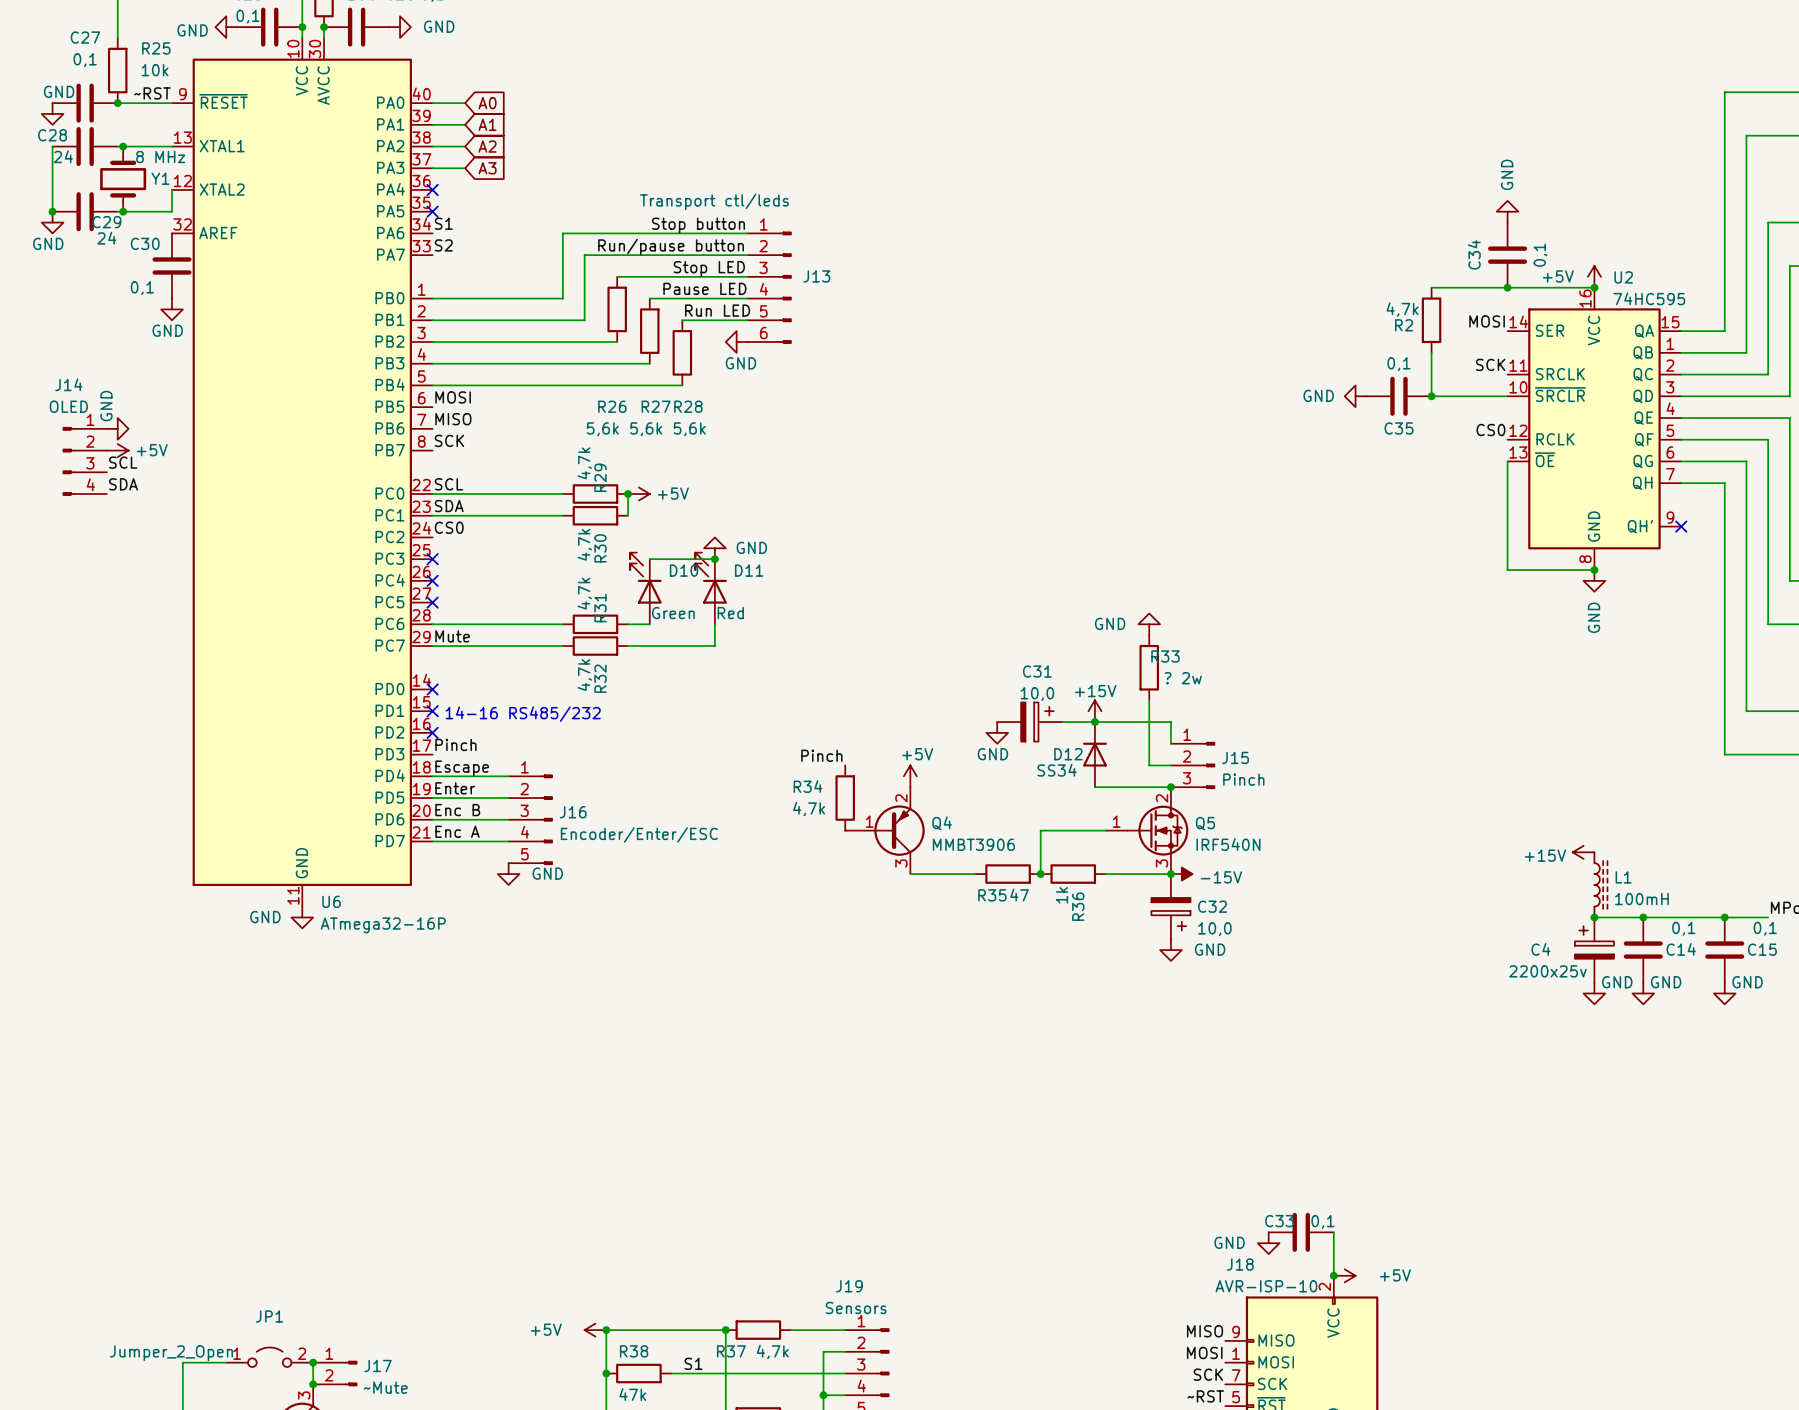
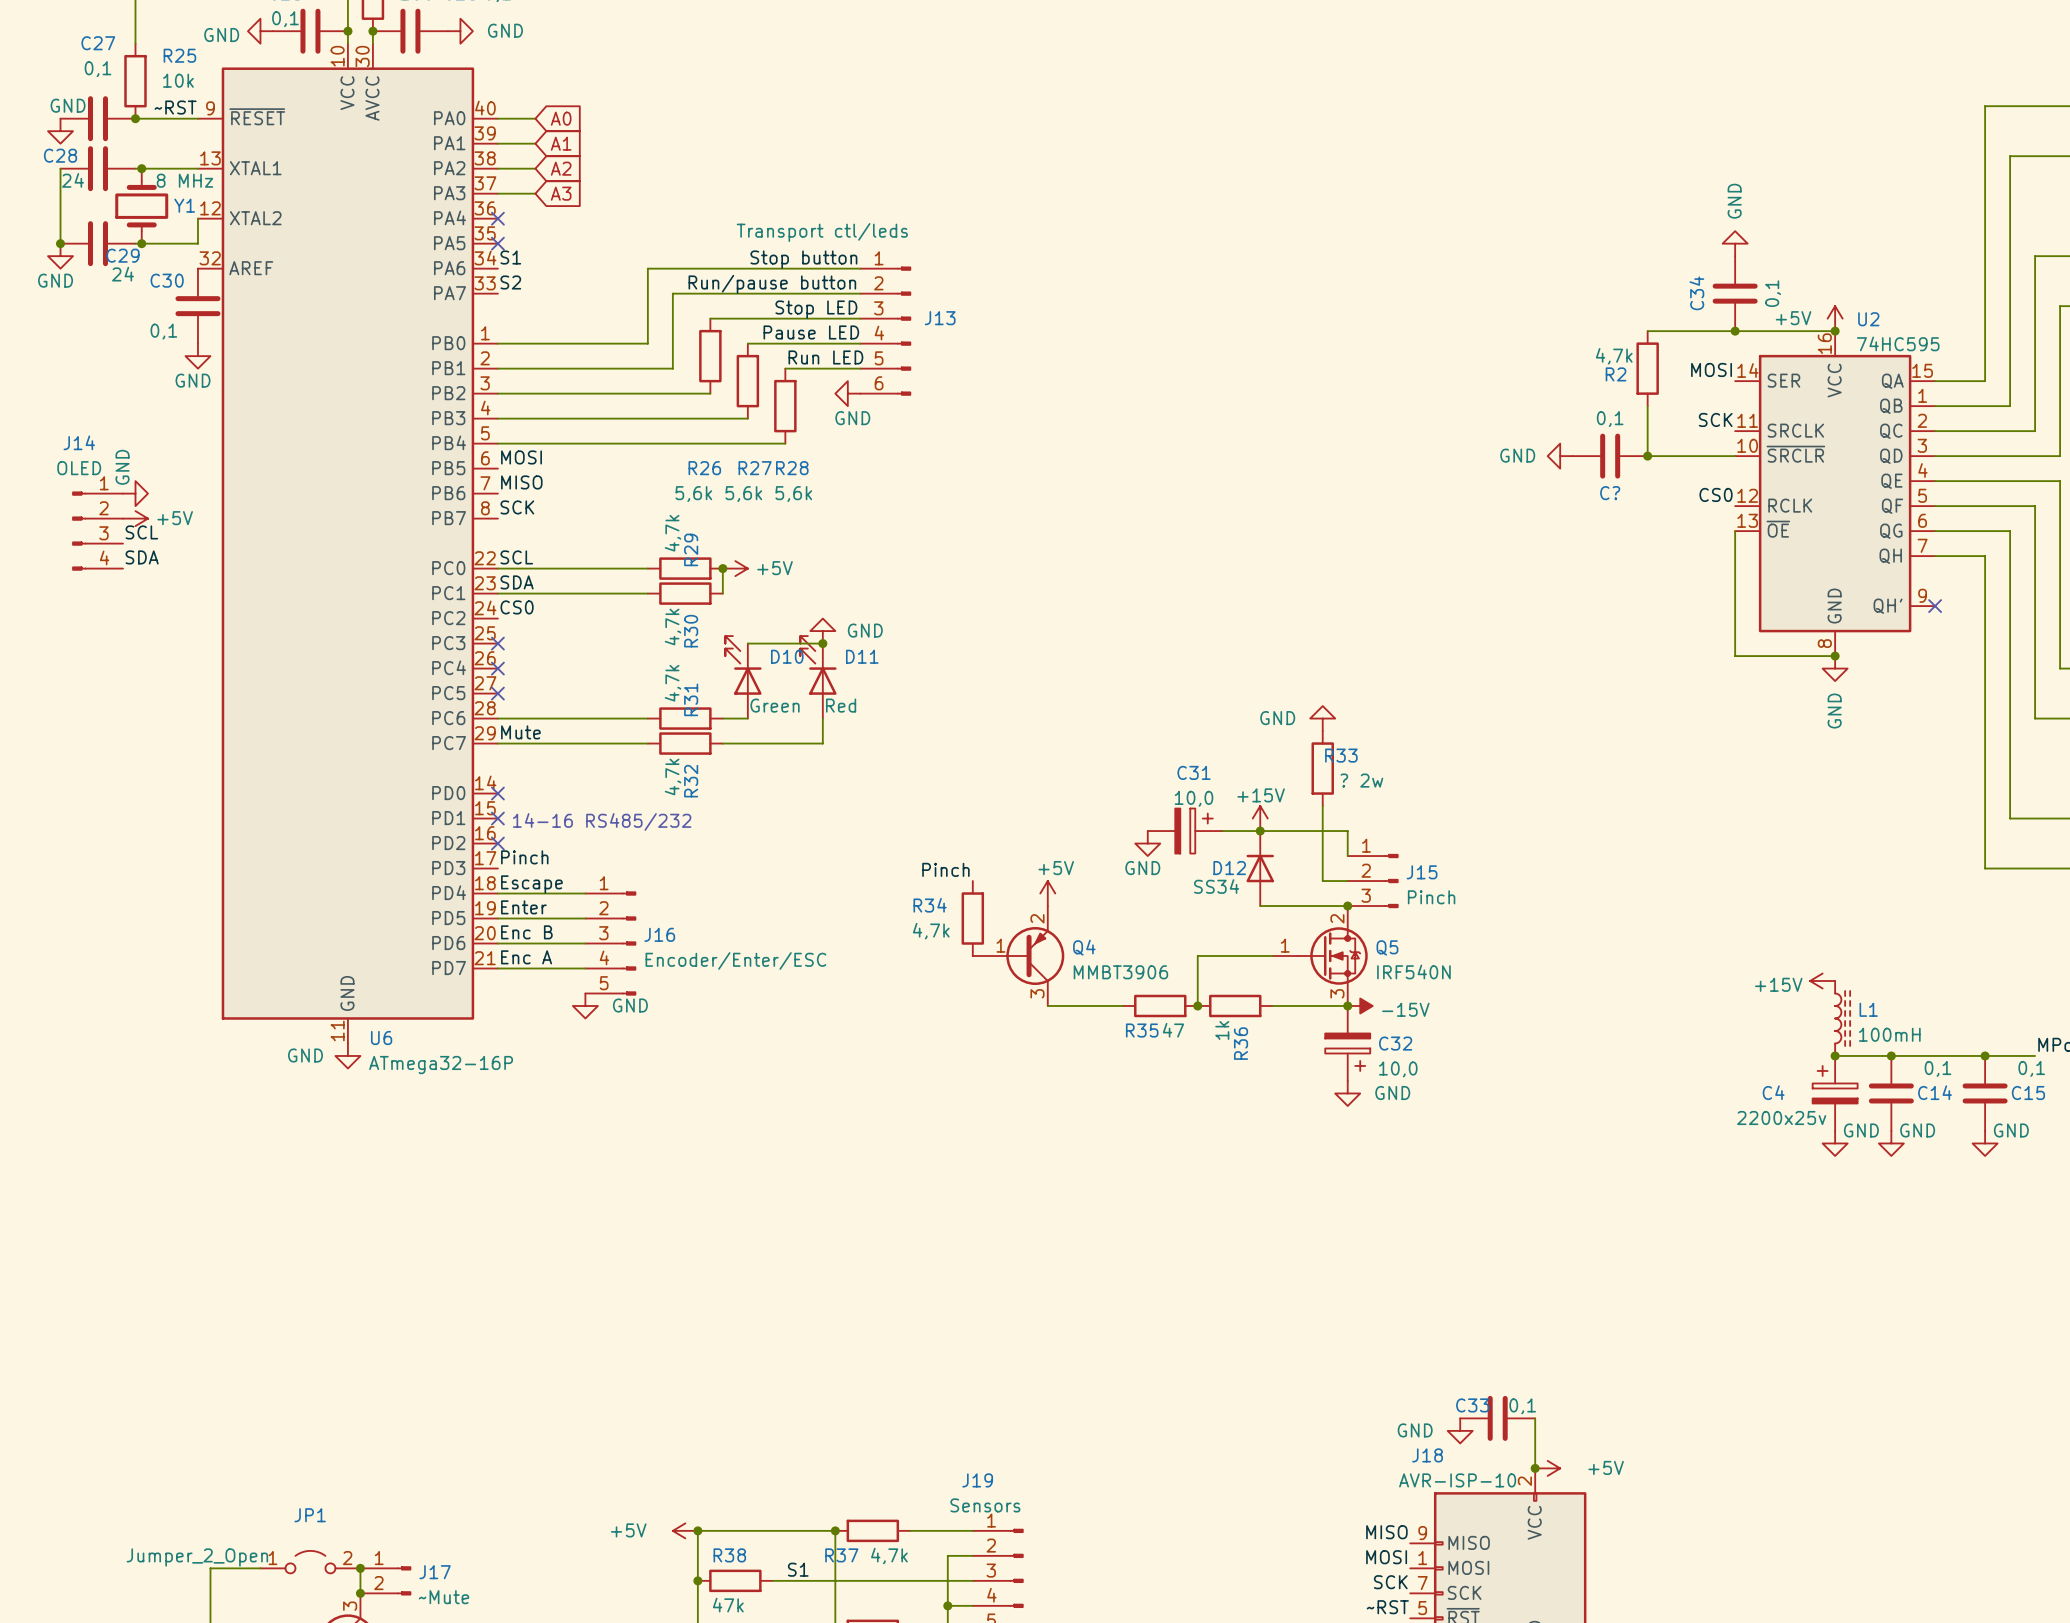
C35 name: C35 (1398, 428) -> C? (1610, 493)

